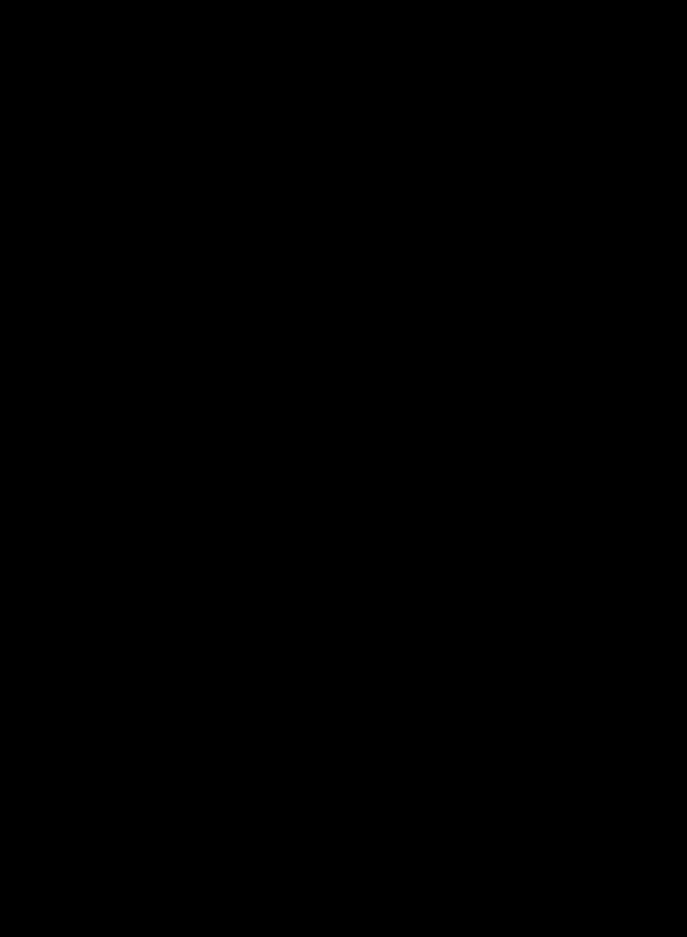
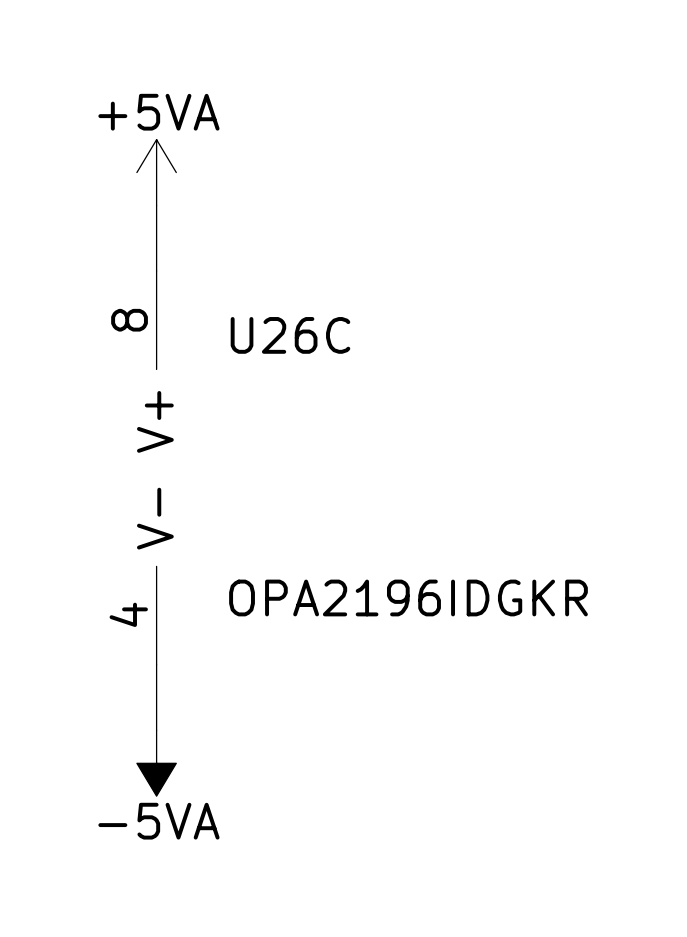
power symbol: none -> +5VA (156, 172)
wire: none -> (156, 205) (156, 270)
U26C: none -> OPA2196IDGKR (156, 467)
wire: none -> (156, 664) (156, 730)
power symbol: none -> -5VA (156, 763)

